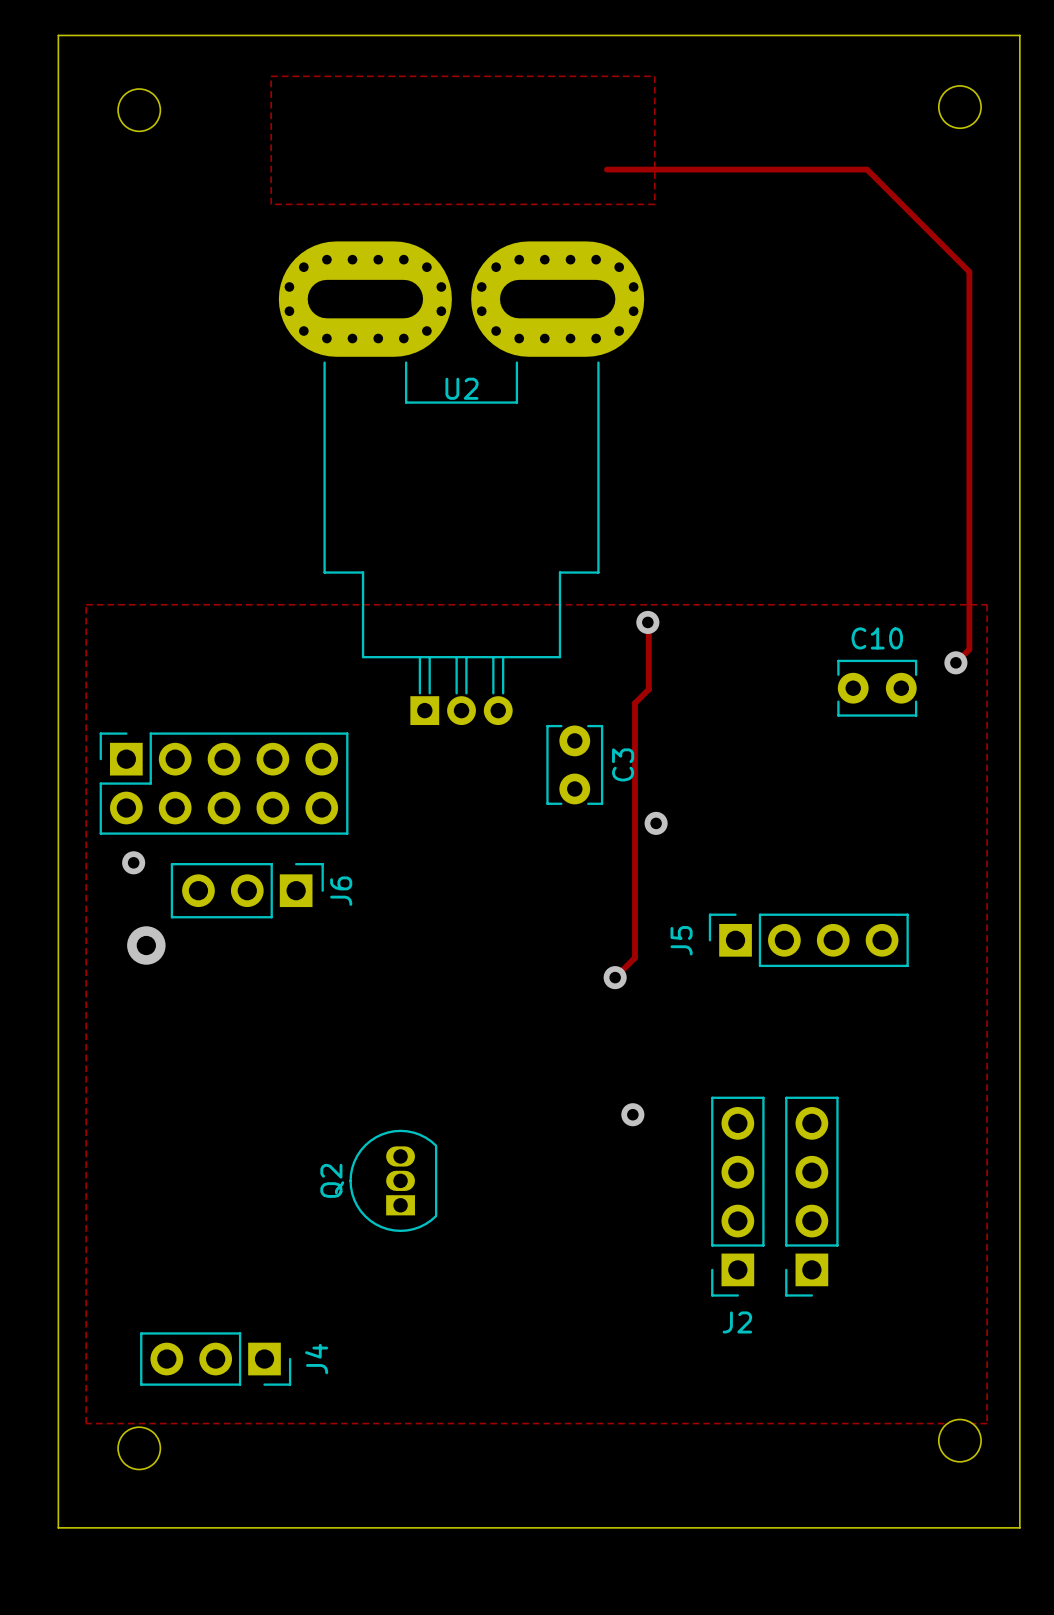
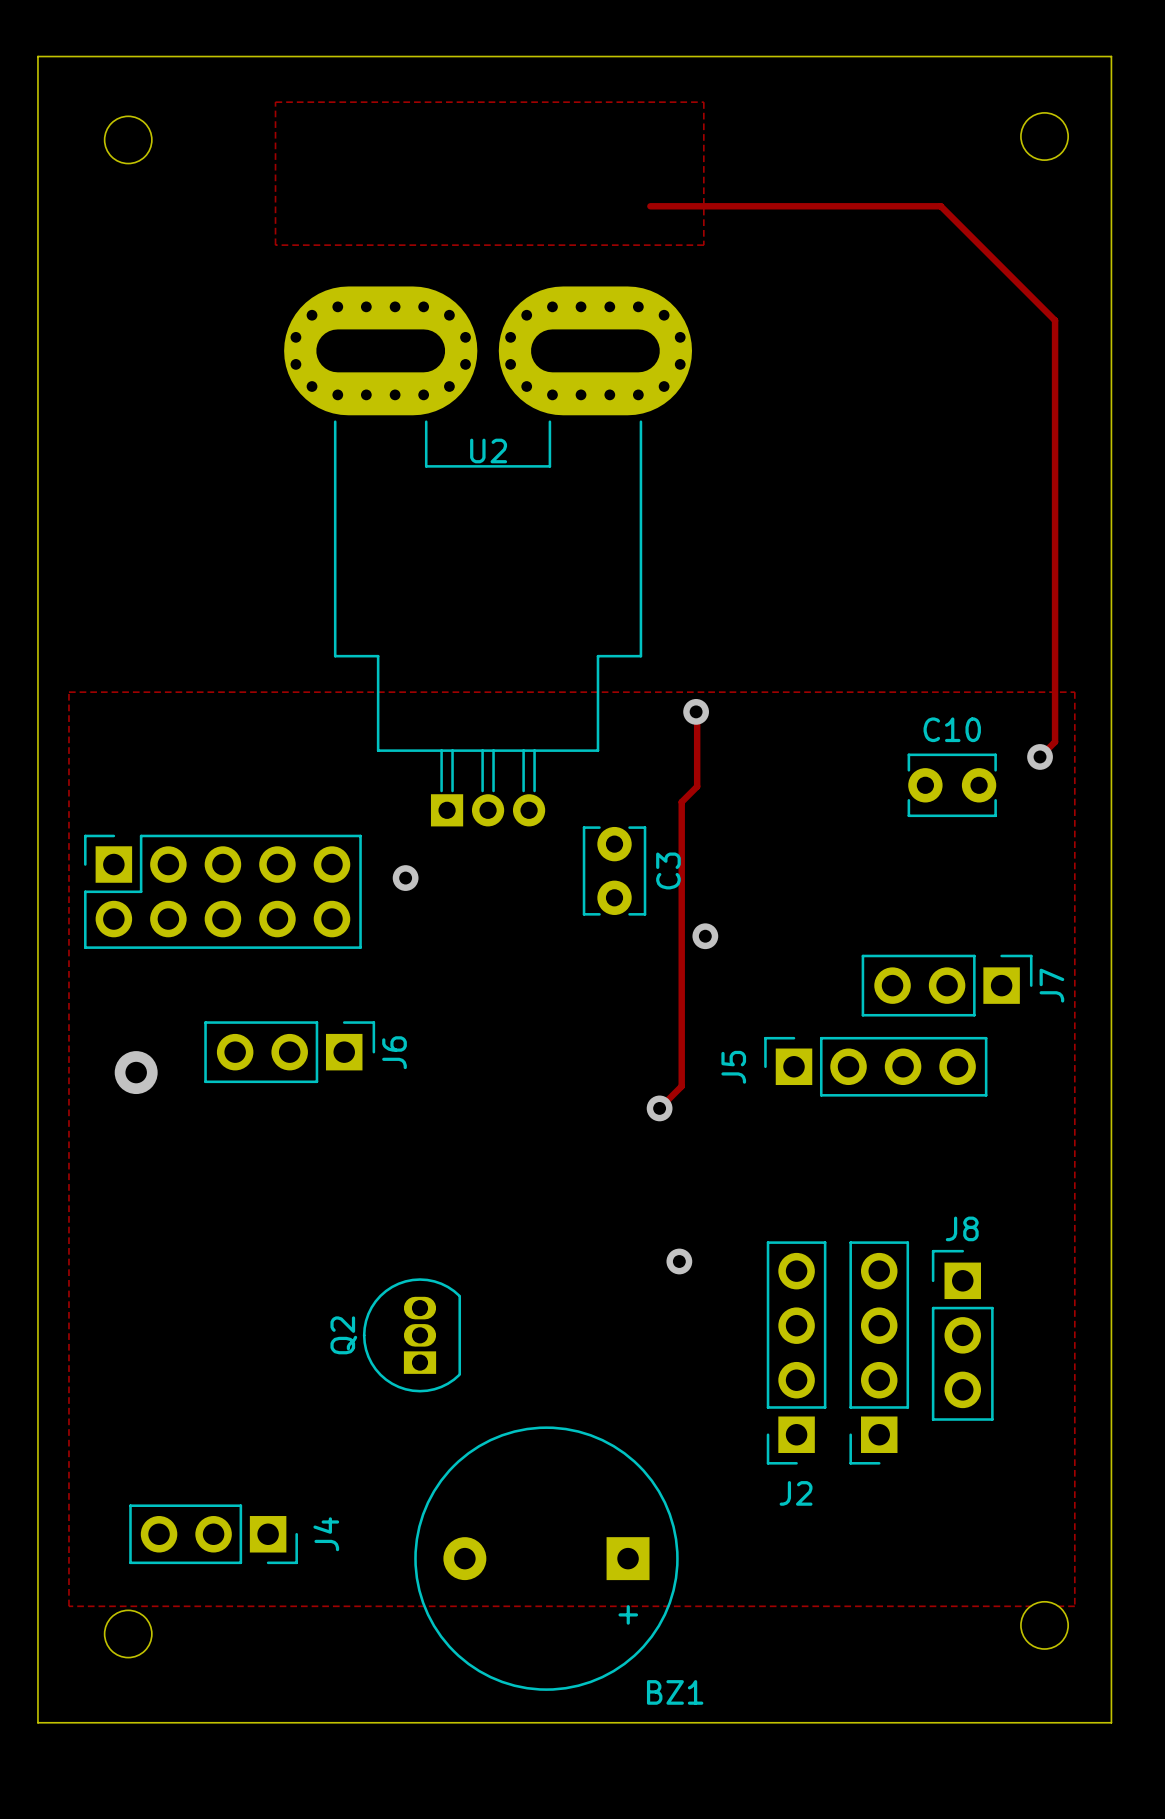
via: none -> (405, 878)
via: (133, 862) -> none
J7: none -> (947, 985)
J6 position: (247, 890) -> (289, 1052)
J8: none -> (962, 1335)
BZ1: none -> (546, 1558)

